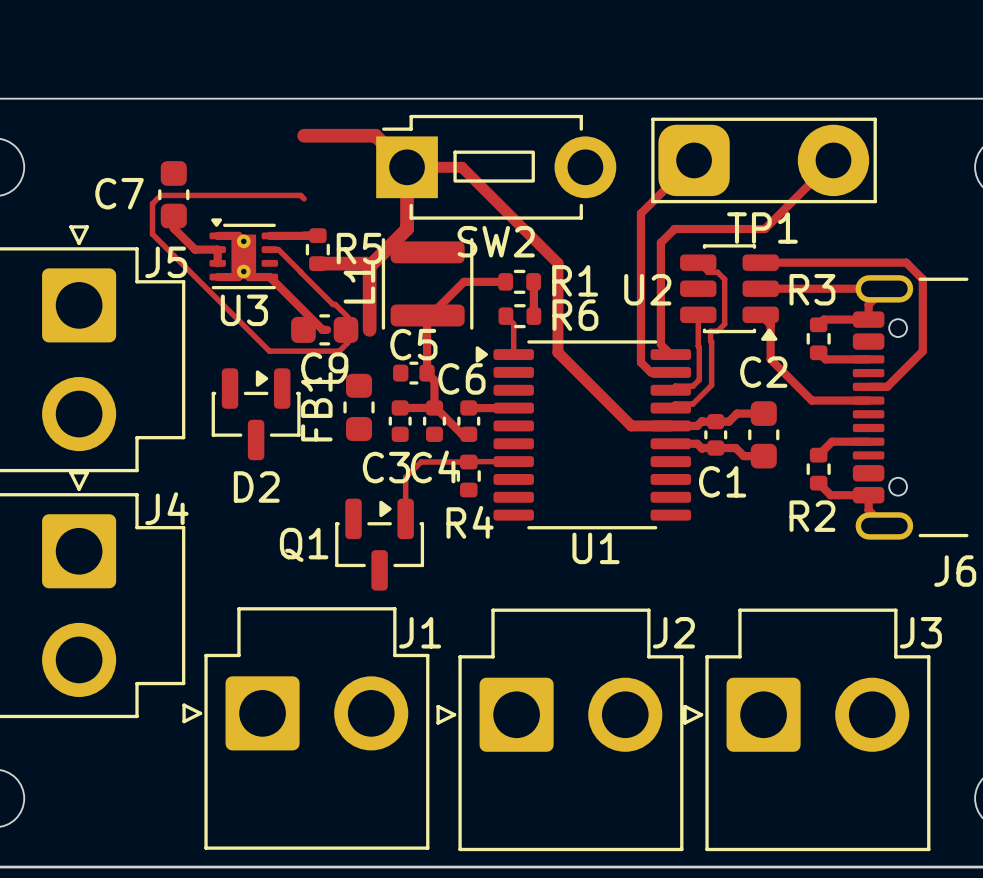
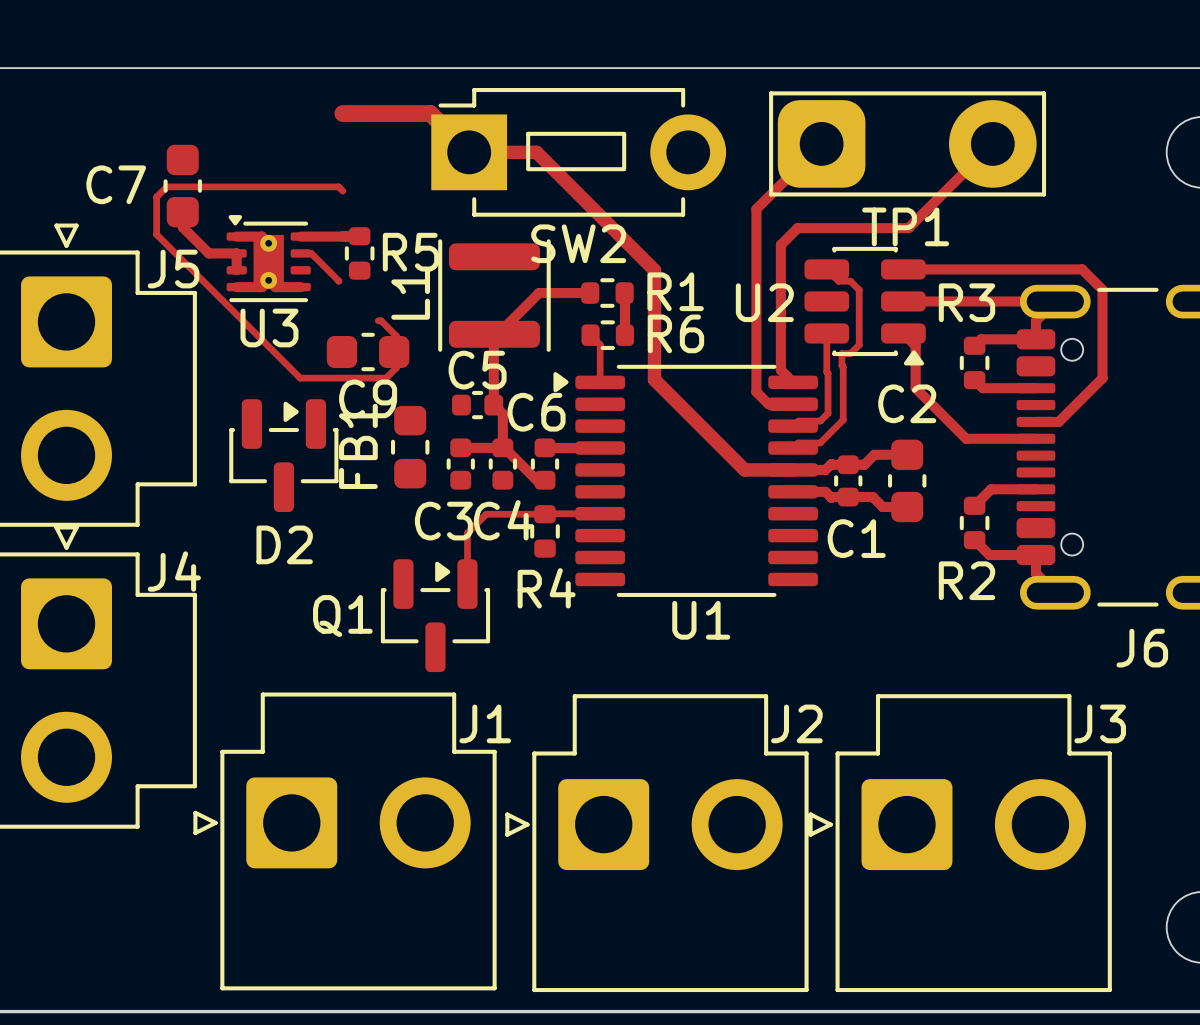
track: (407, 167) (407, 229) (369, 266) -> none
track: (317, 263) (366, 263) (369, 266) -> none
track: (369, 266) (369, 329) -> none
track: (300, 272) (332, 304) -> none
track: (269, 277) (322, 329) (327, 329) -> none

